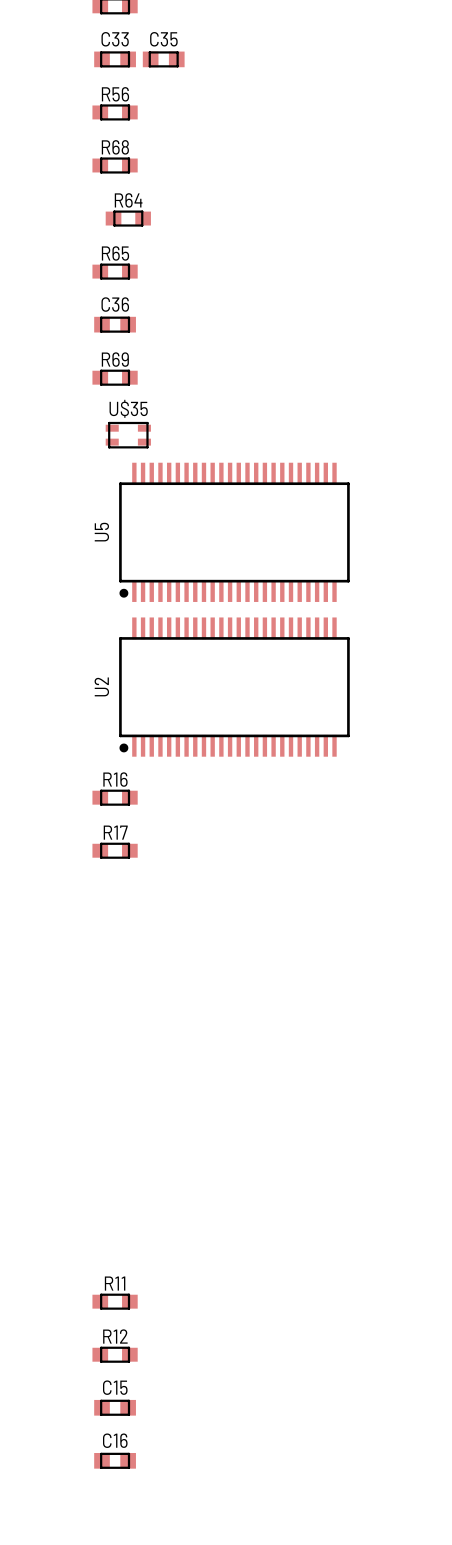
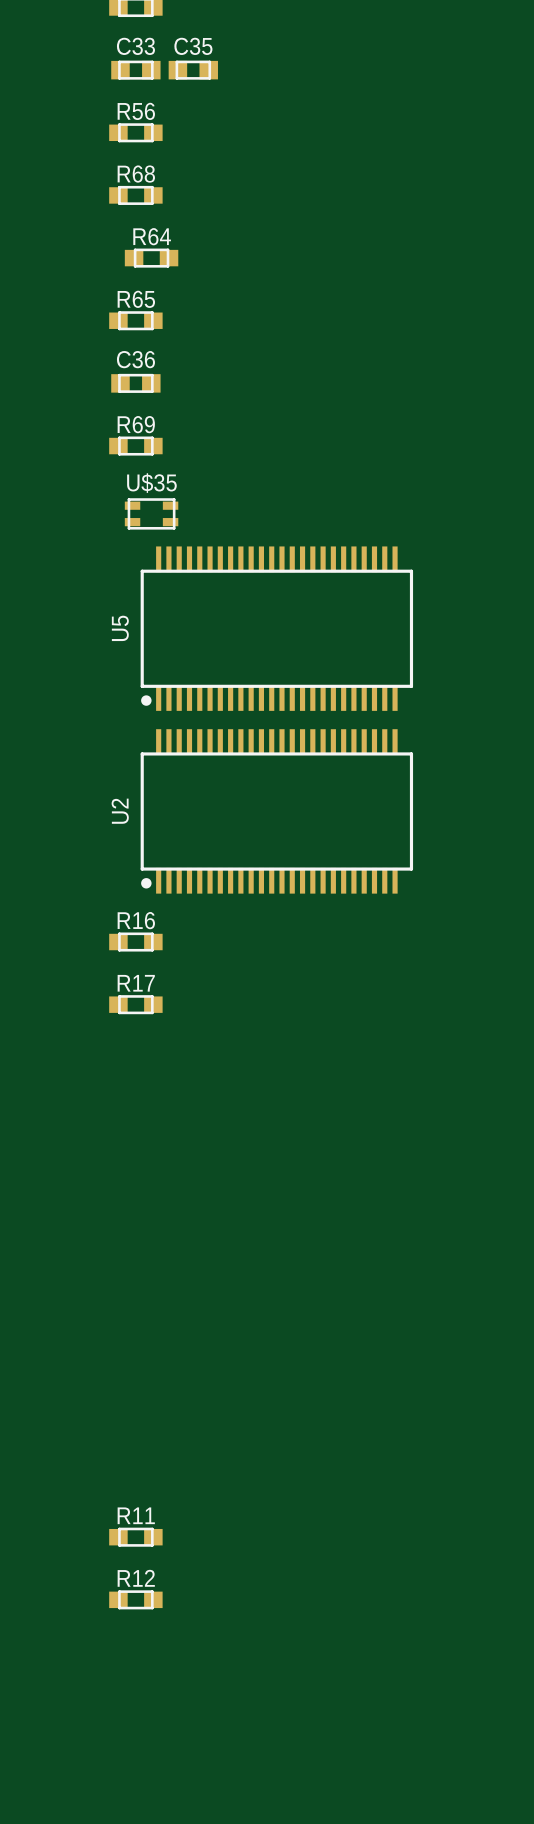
C15: (115, 1407) -> none
C16: (115, 1460) -> none

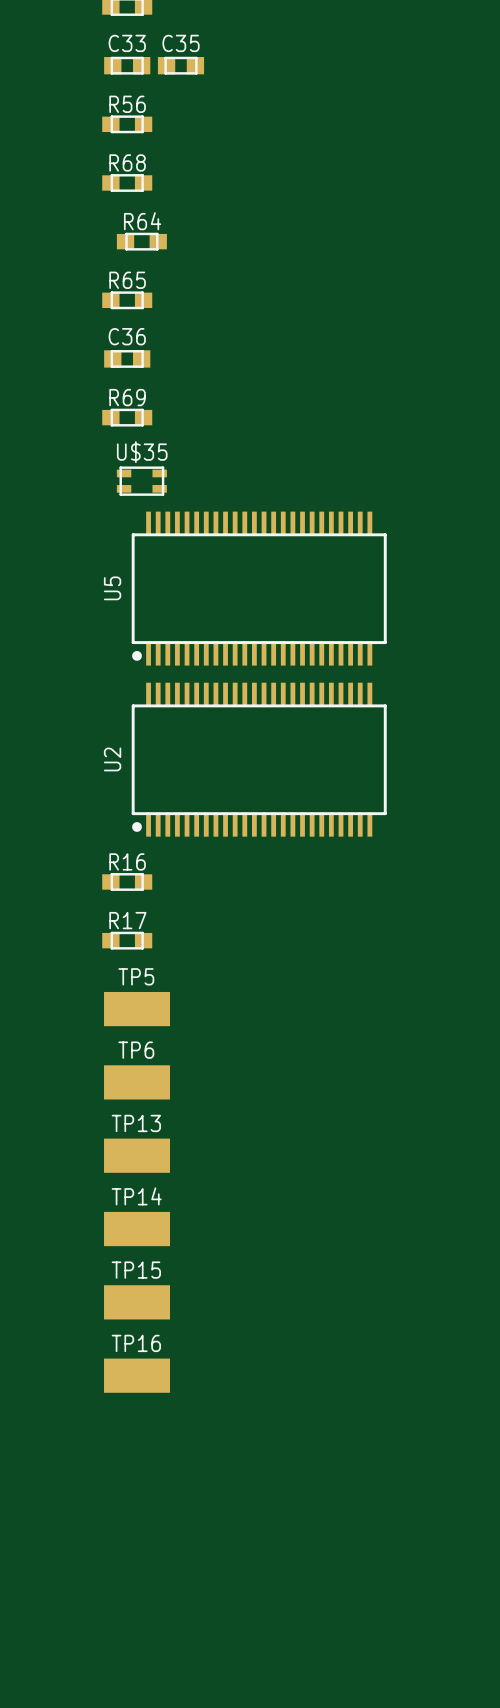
TP5: none -> (137, 1009)
TP6: none -> (137, 1082)
TP13: none -> (137, 1155)
TP14: none -> (137, 1229)
TP15: none -> (137, 1302)
TP16: none -> (137, 1375)
R11: (135, 1537) -> none
R12: (135, 1599) -> none

